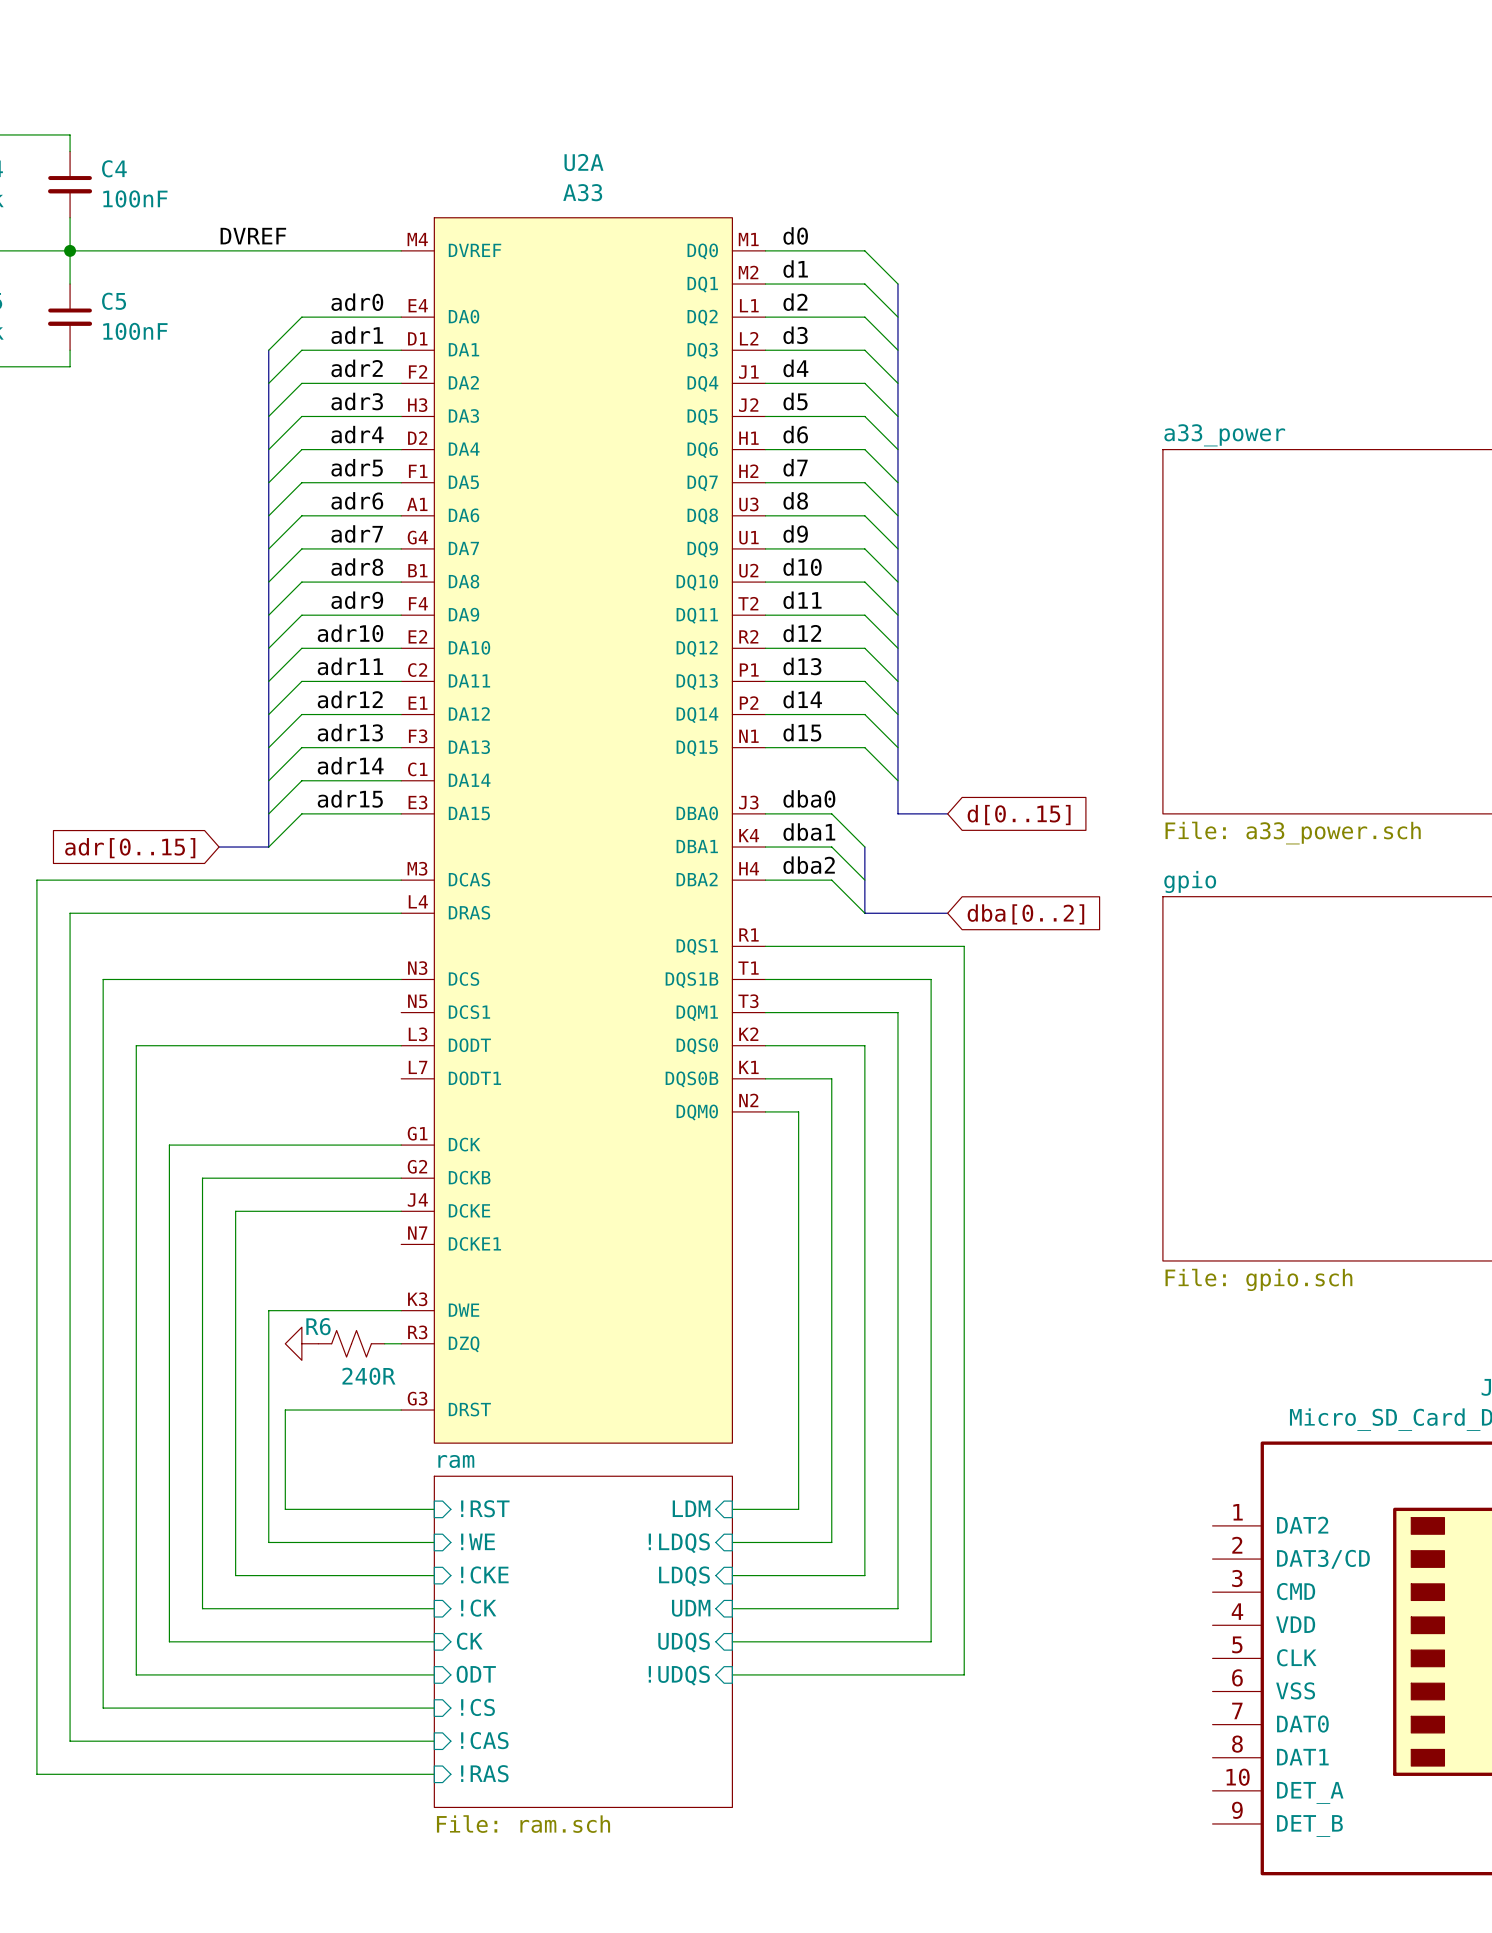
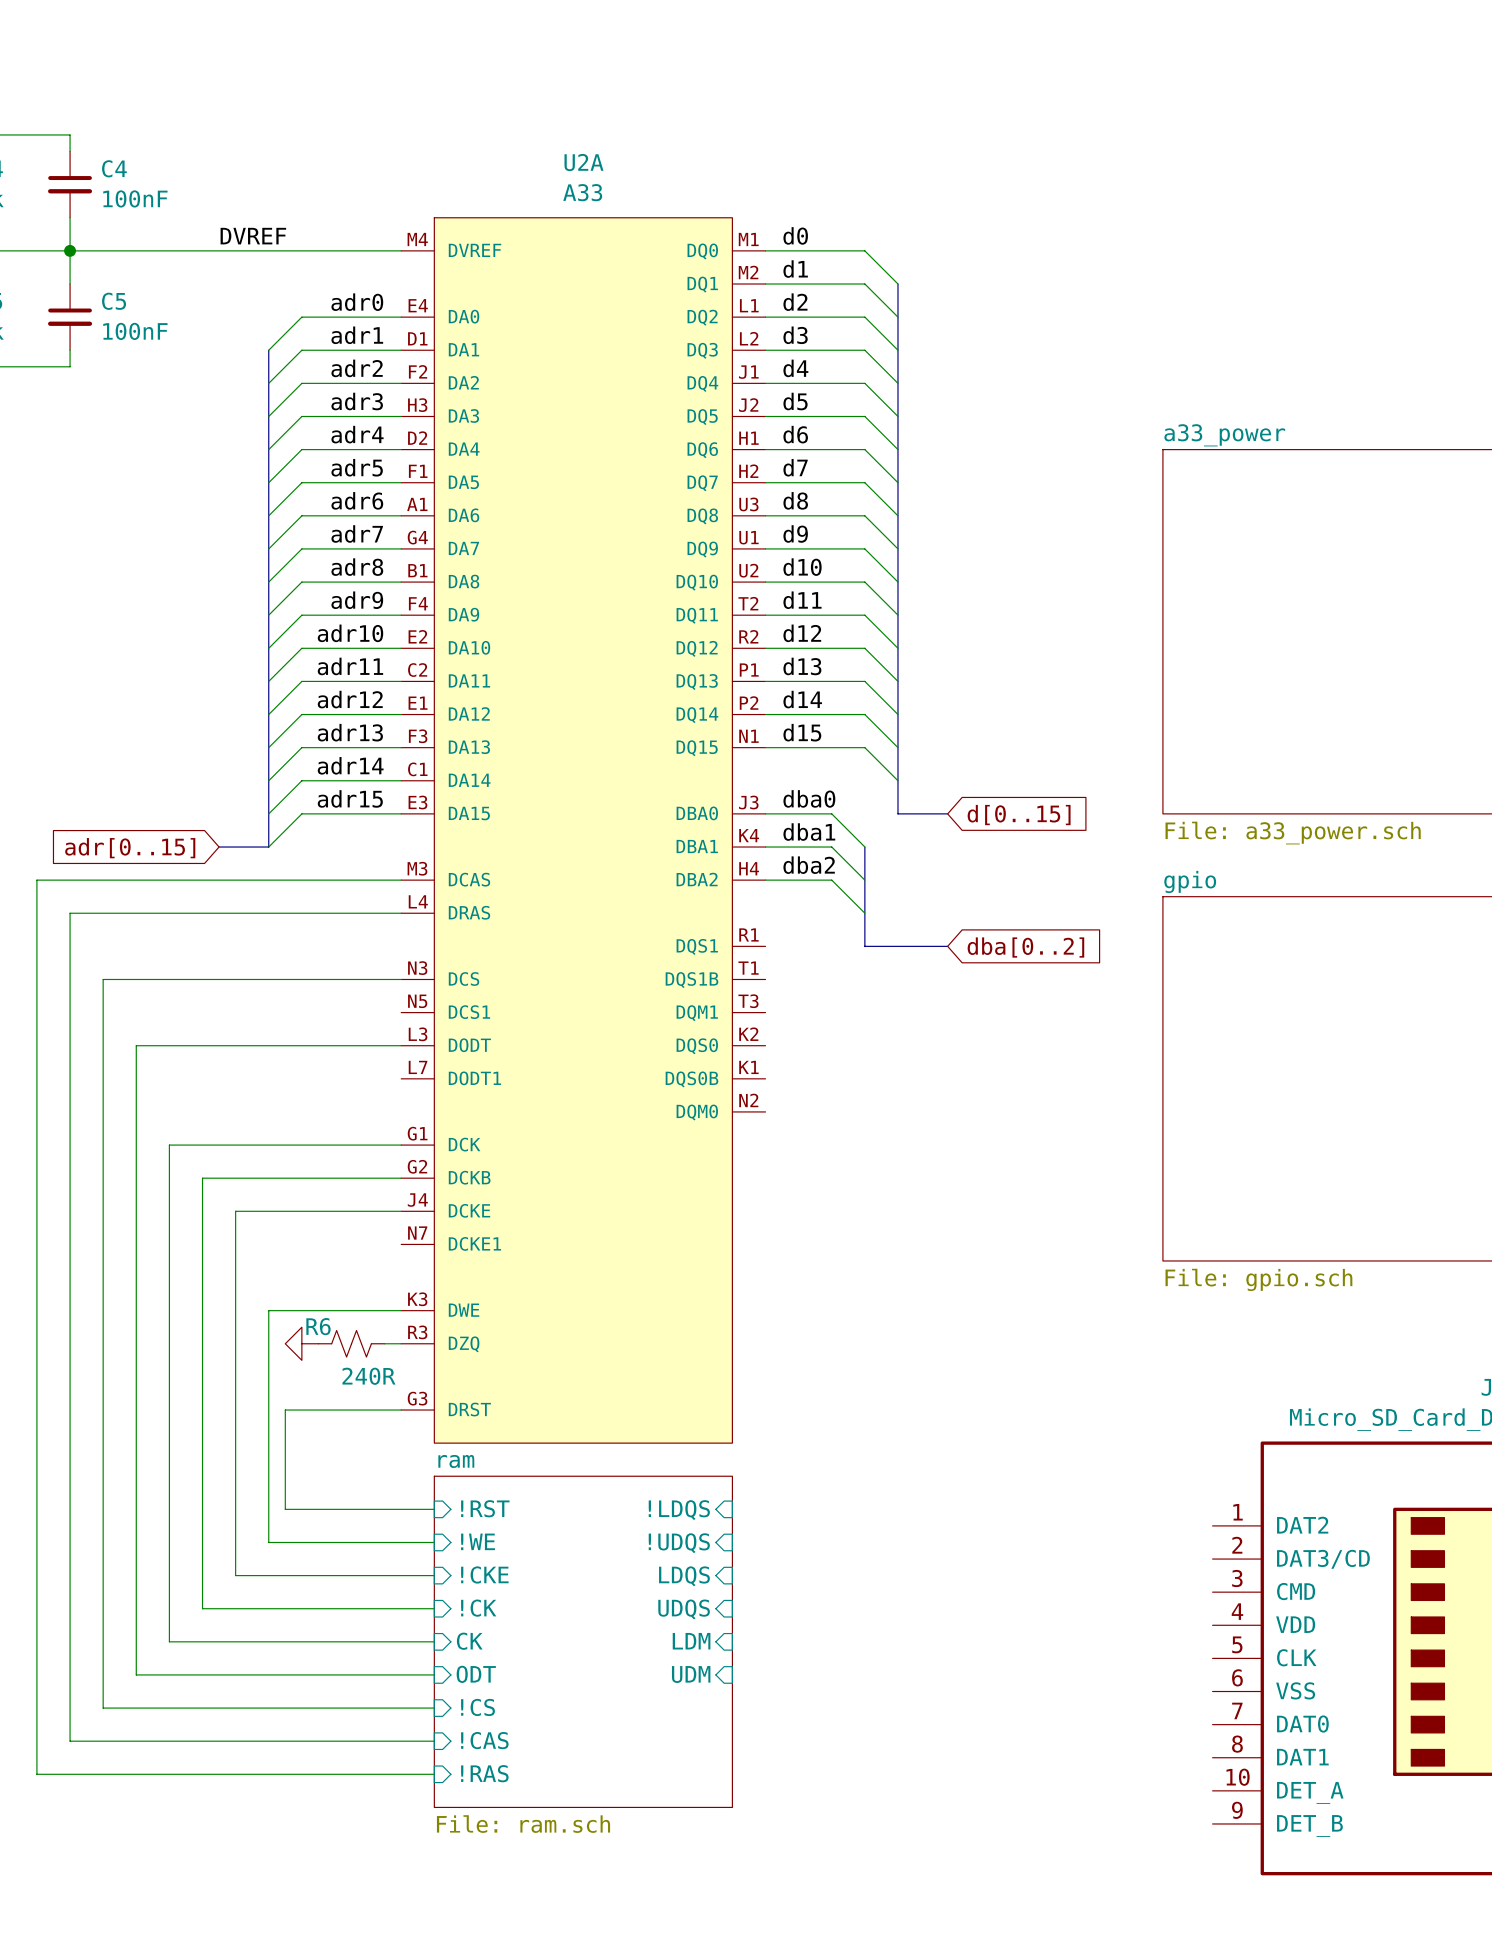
bus: (864, 913) (947, 913) -> (864, 913) (864, 946) (947, 946)
global label position: dba[0..2] (1025, 914) -> dba[0..2] (1025, 947)
wire: (765, 946) (964, 946) (964, 1674) (732, 1674) -> none
wire: (765, 979) (931, 979) (931, 1641) (732, 1641) -> none
wire: (765, 1012) (897, 1012) (897, 1608) (732, 1608) -> none
wire: (765, 1045) (864, 1045) (864, 1575) (732, 1575) -> none
wire: (765, 1078) (831, 1078) (831, 1542) (732, 1542) -> none
wire: (765, 1111) (798, 1111) (798, 1509) (732, 1509) -> none
sheet pin: LDM (691, 1508) -> !LDQS (679, 1510)
sheet pin: !LDQS (679, 1543) -> !UDQS (679, 1543)
sheet pin: UDM (691, 1608) -> UDQS (684, 1609)
sheet pin: UDQS (684, 1642) -> LDM (691, 1641)
sheet pin: !UDQS (679, 1675) -> UDM (691, 1674)

